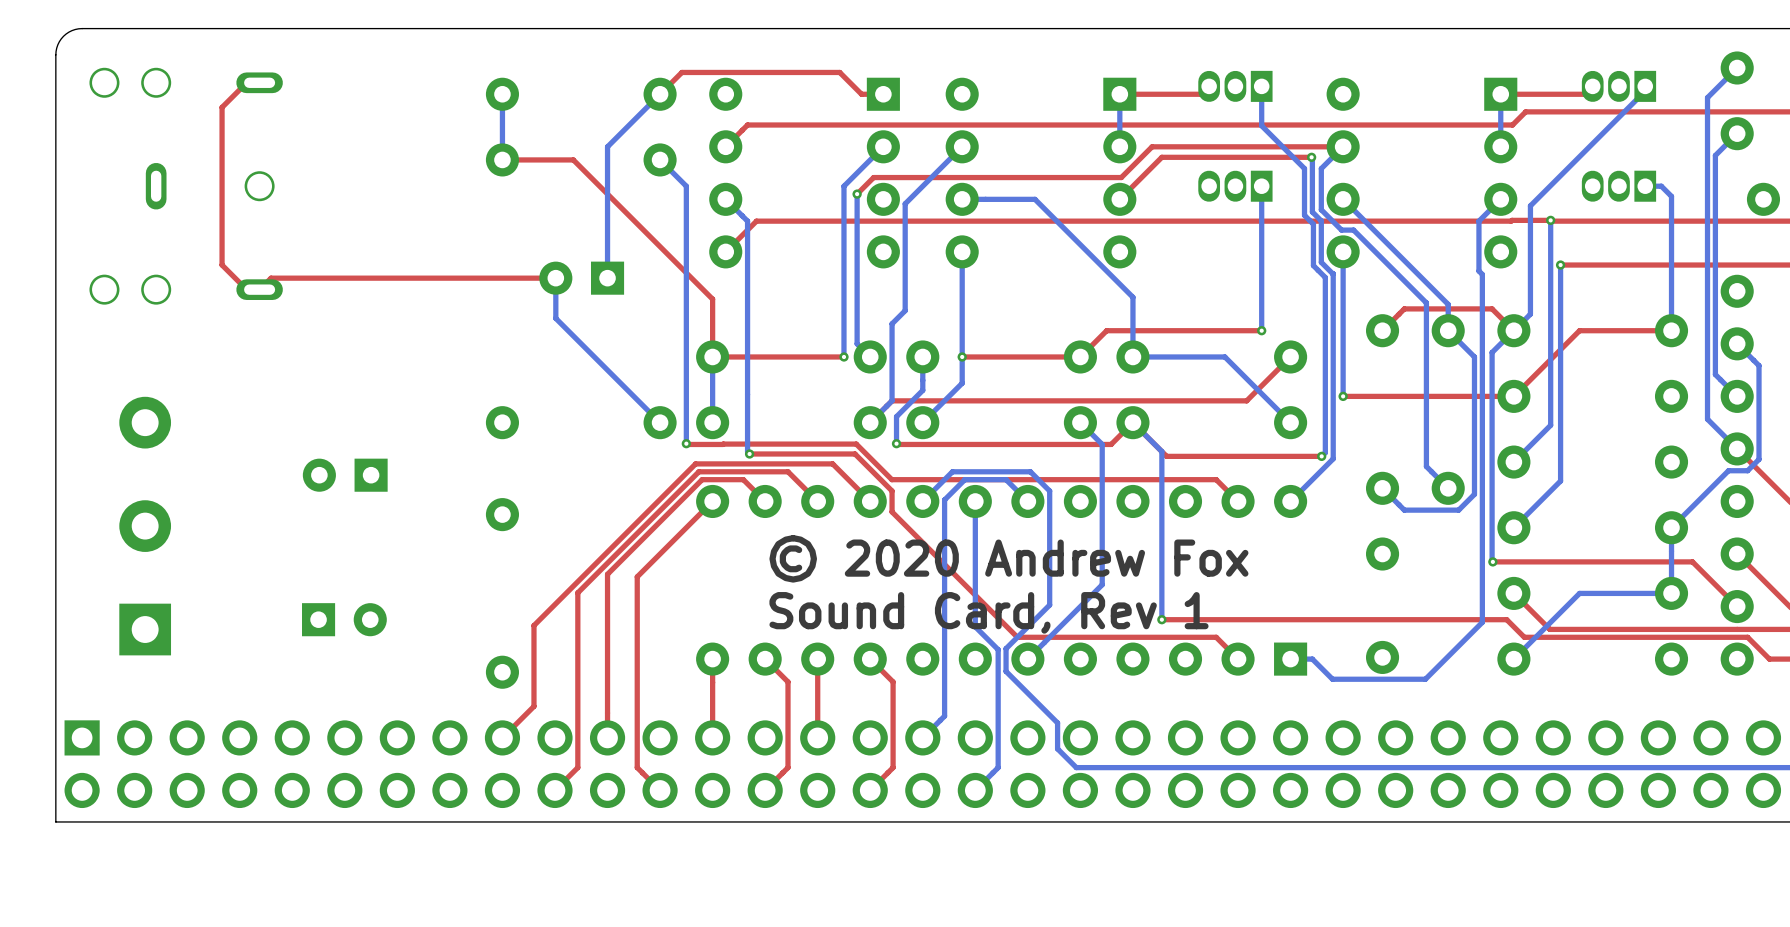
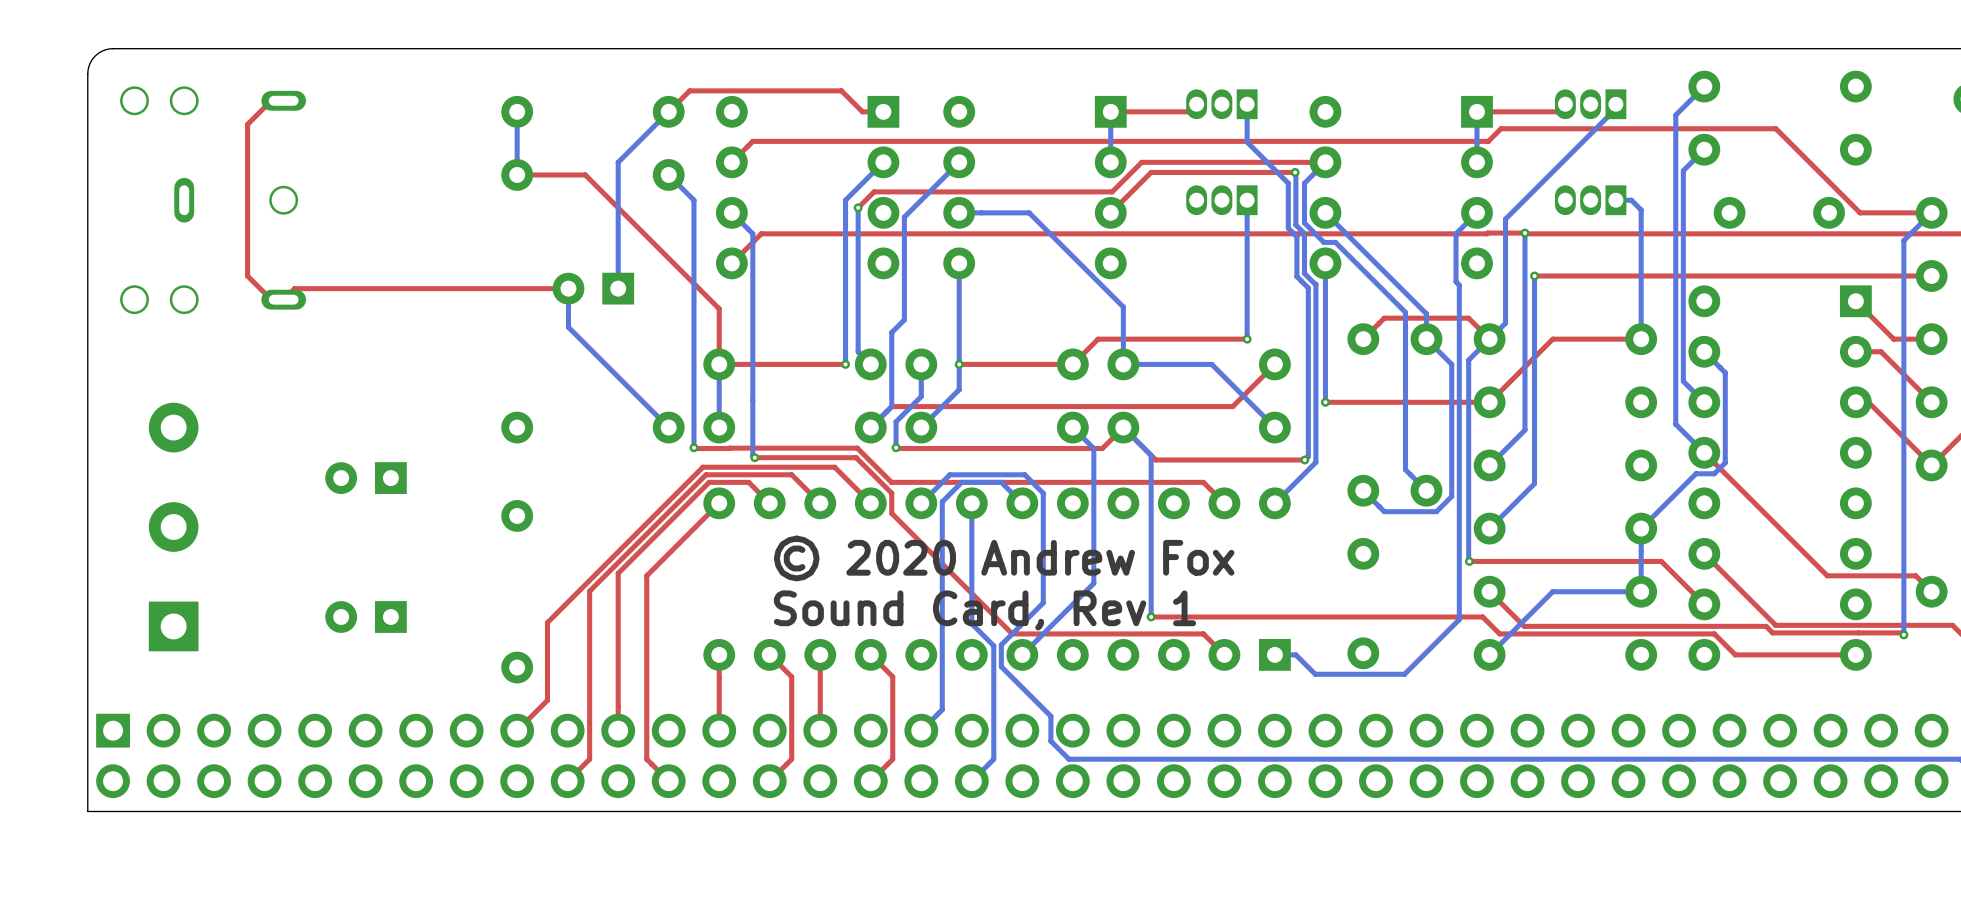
part rotation: 0° (344, 619) -> 180° (366, 617)

